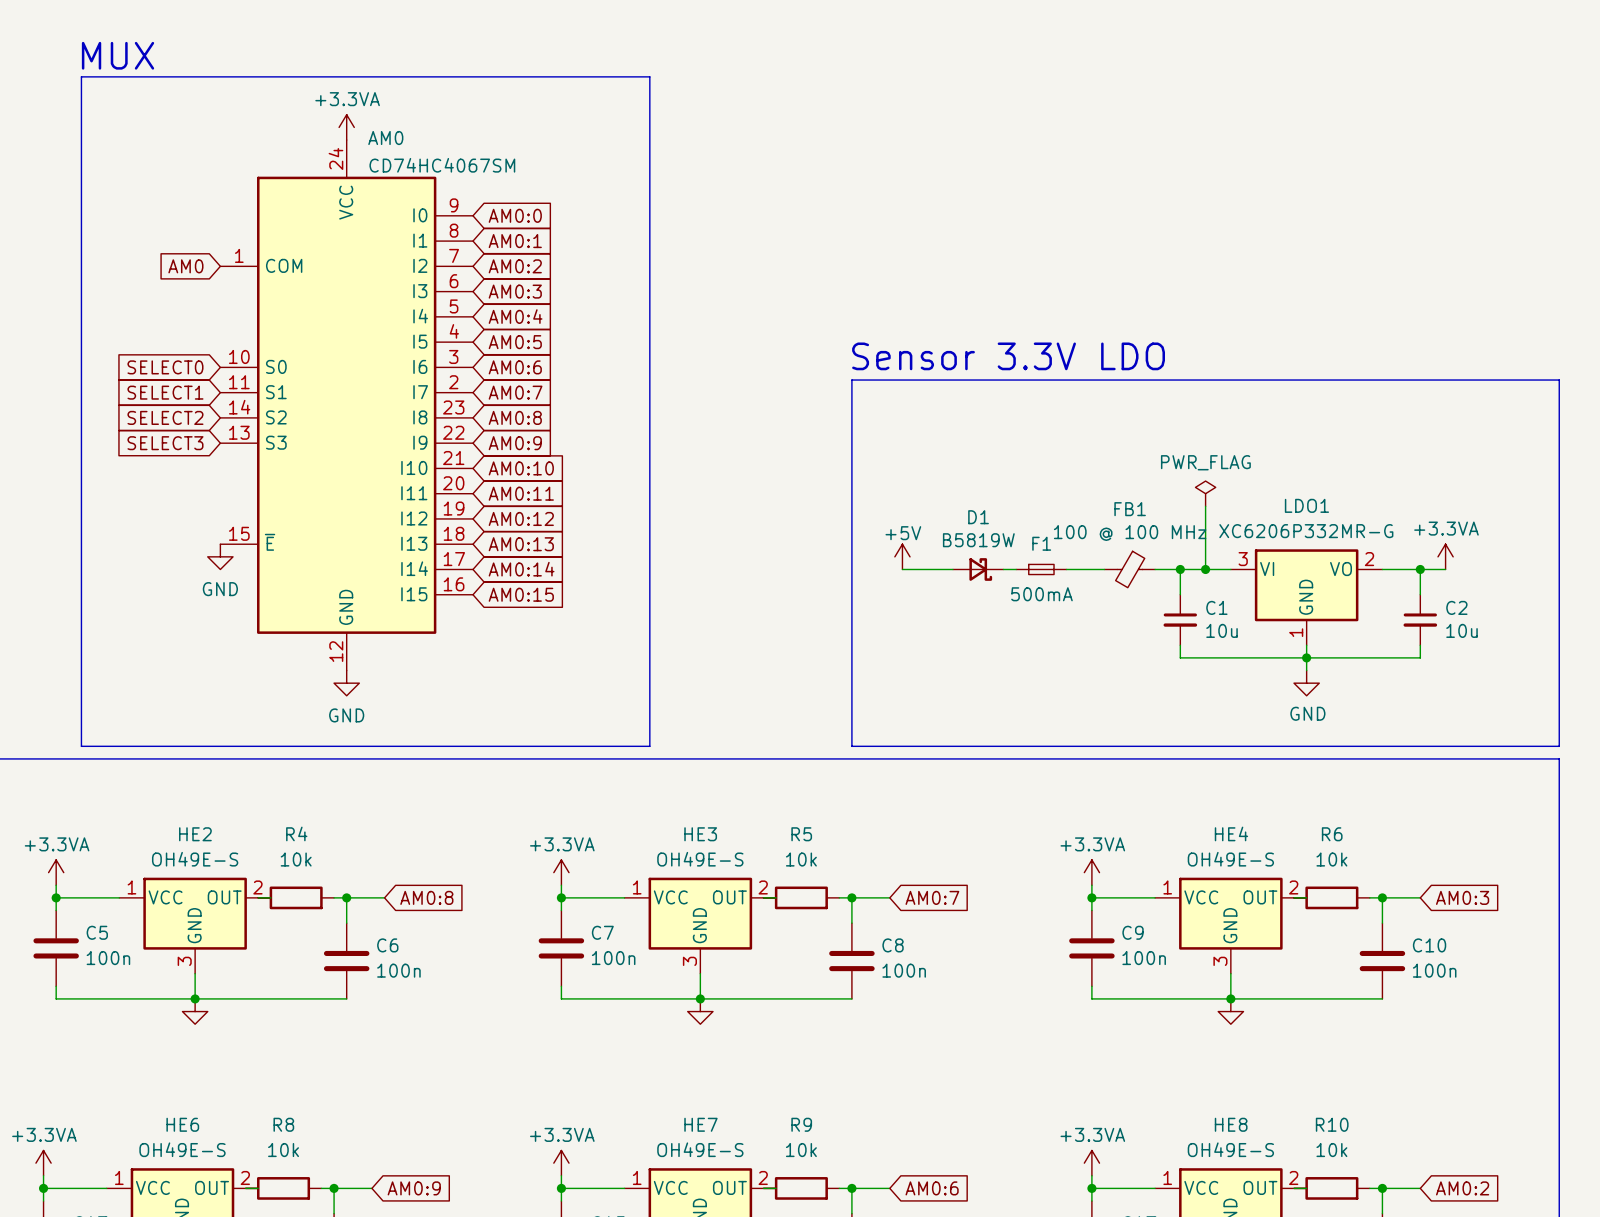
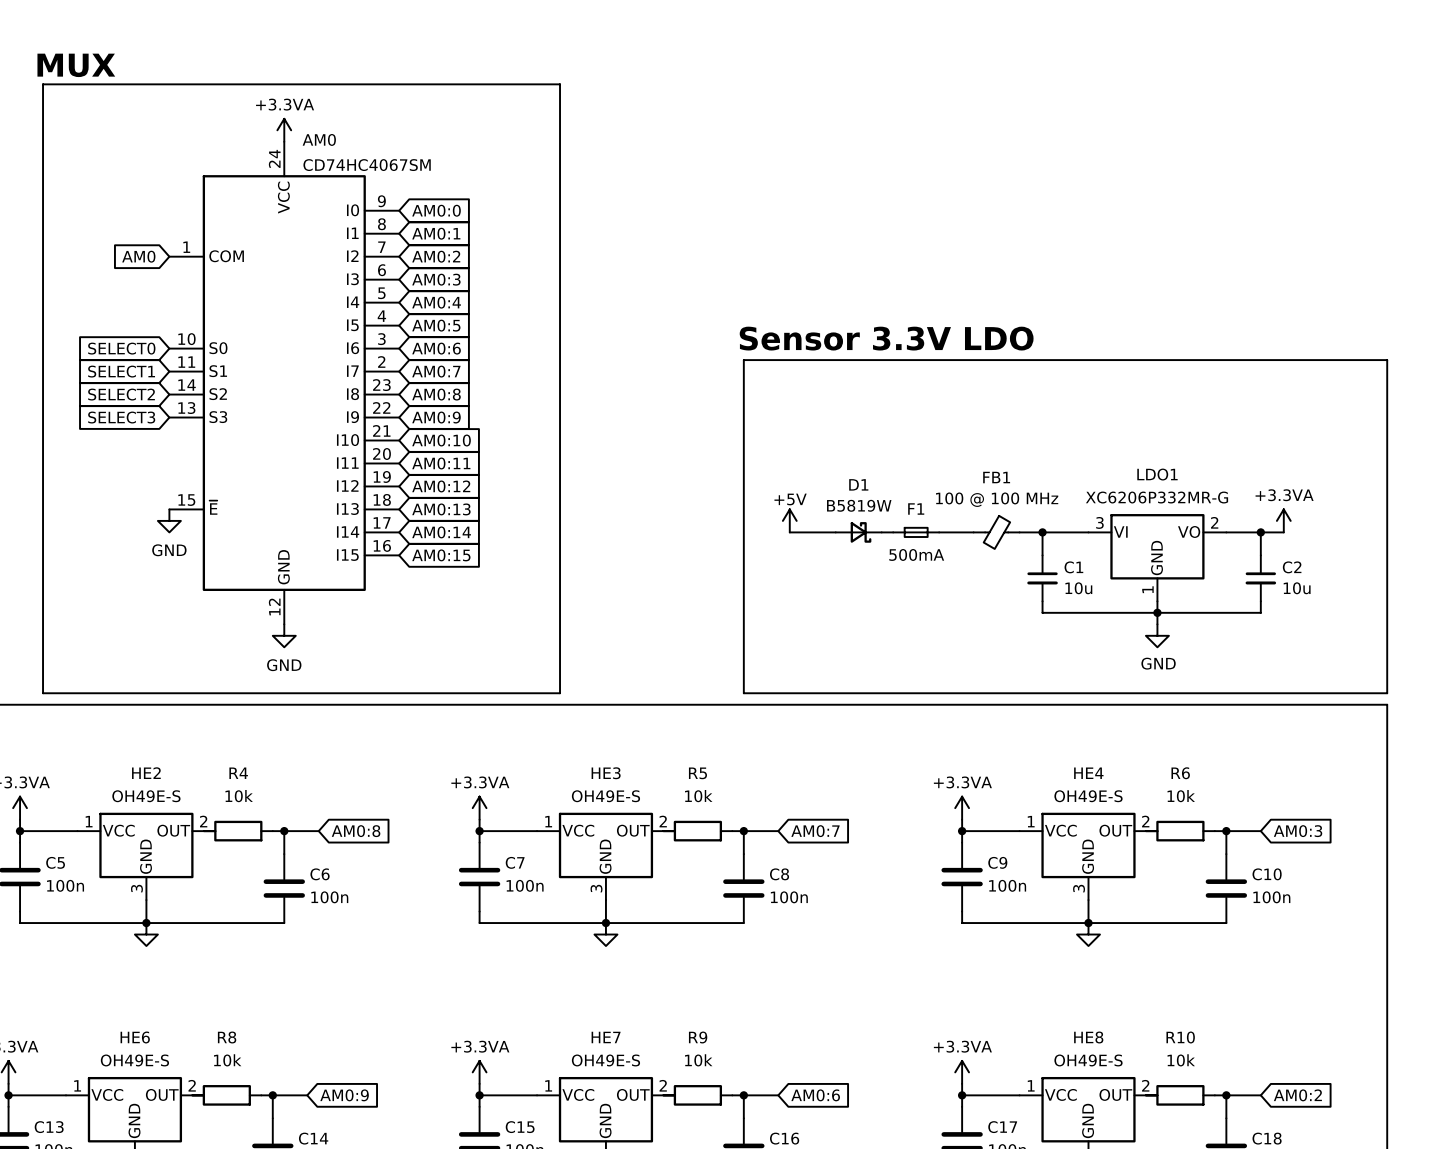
power symbol: PWR_FLAG (1205, 493) -> none
wire: (1205, 506) (1205, 569) -> none
junction: (1205, 569) -> none

